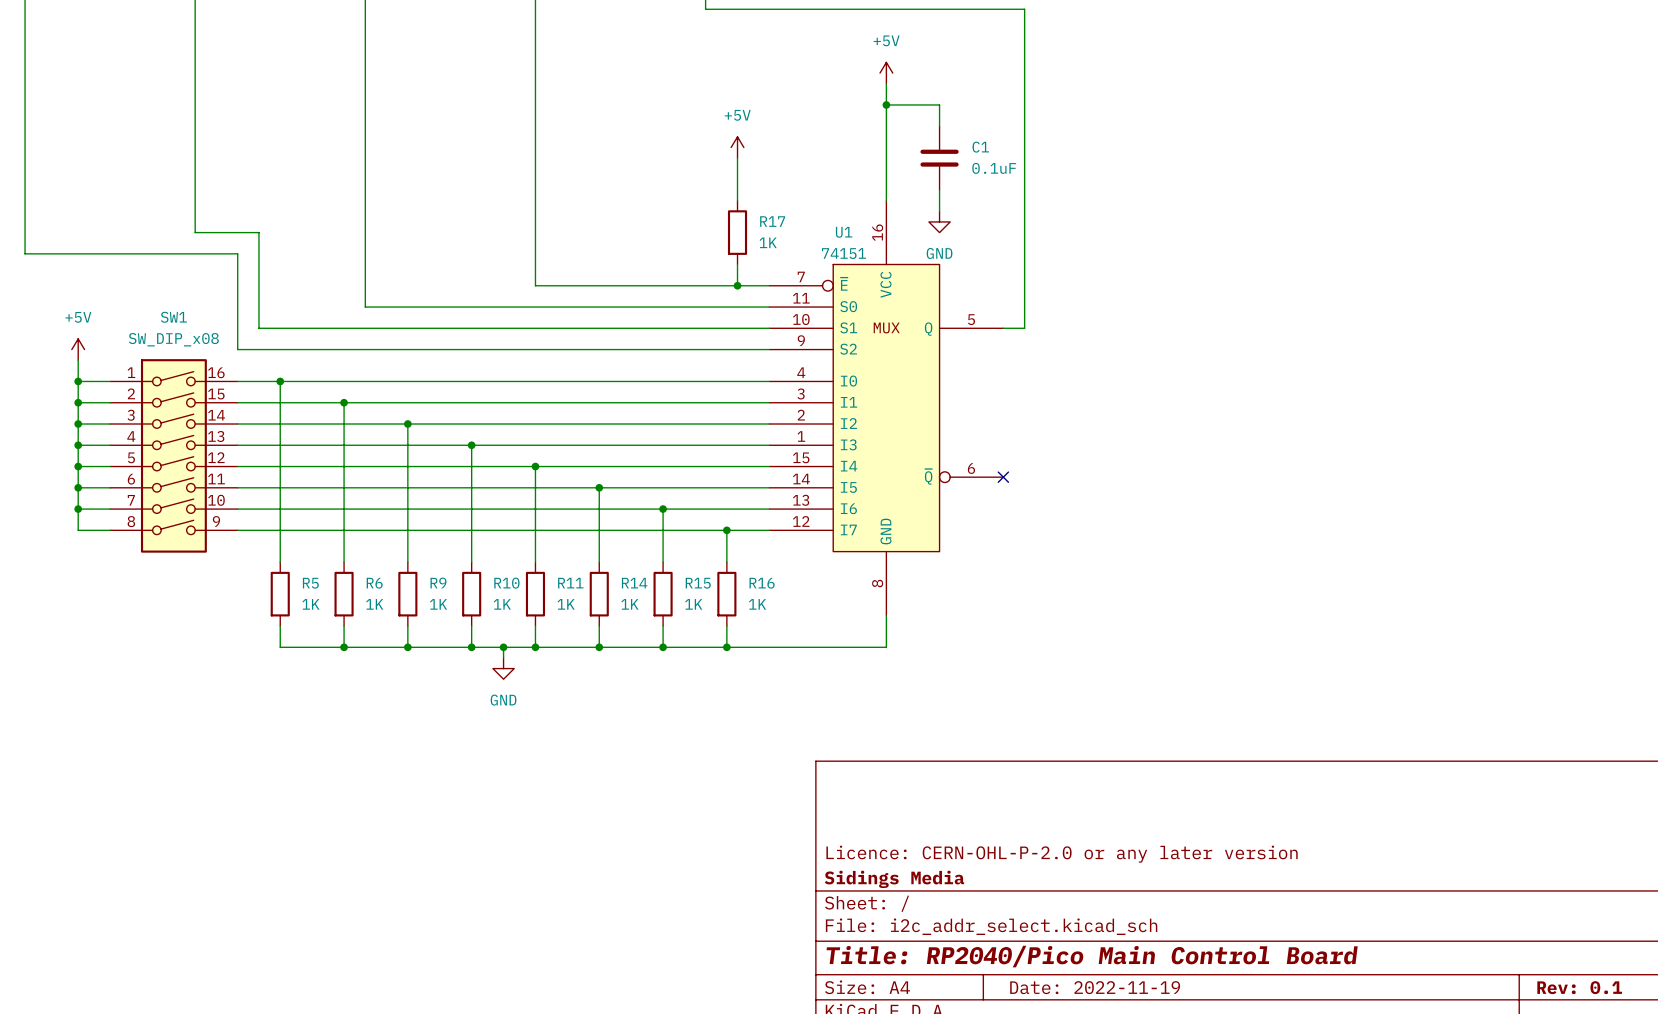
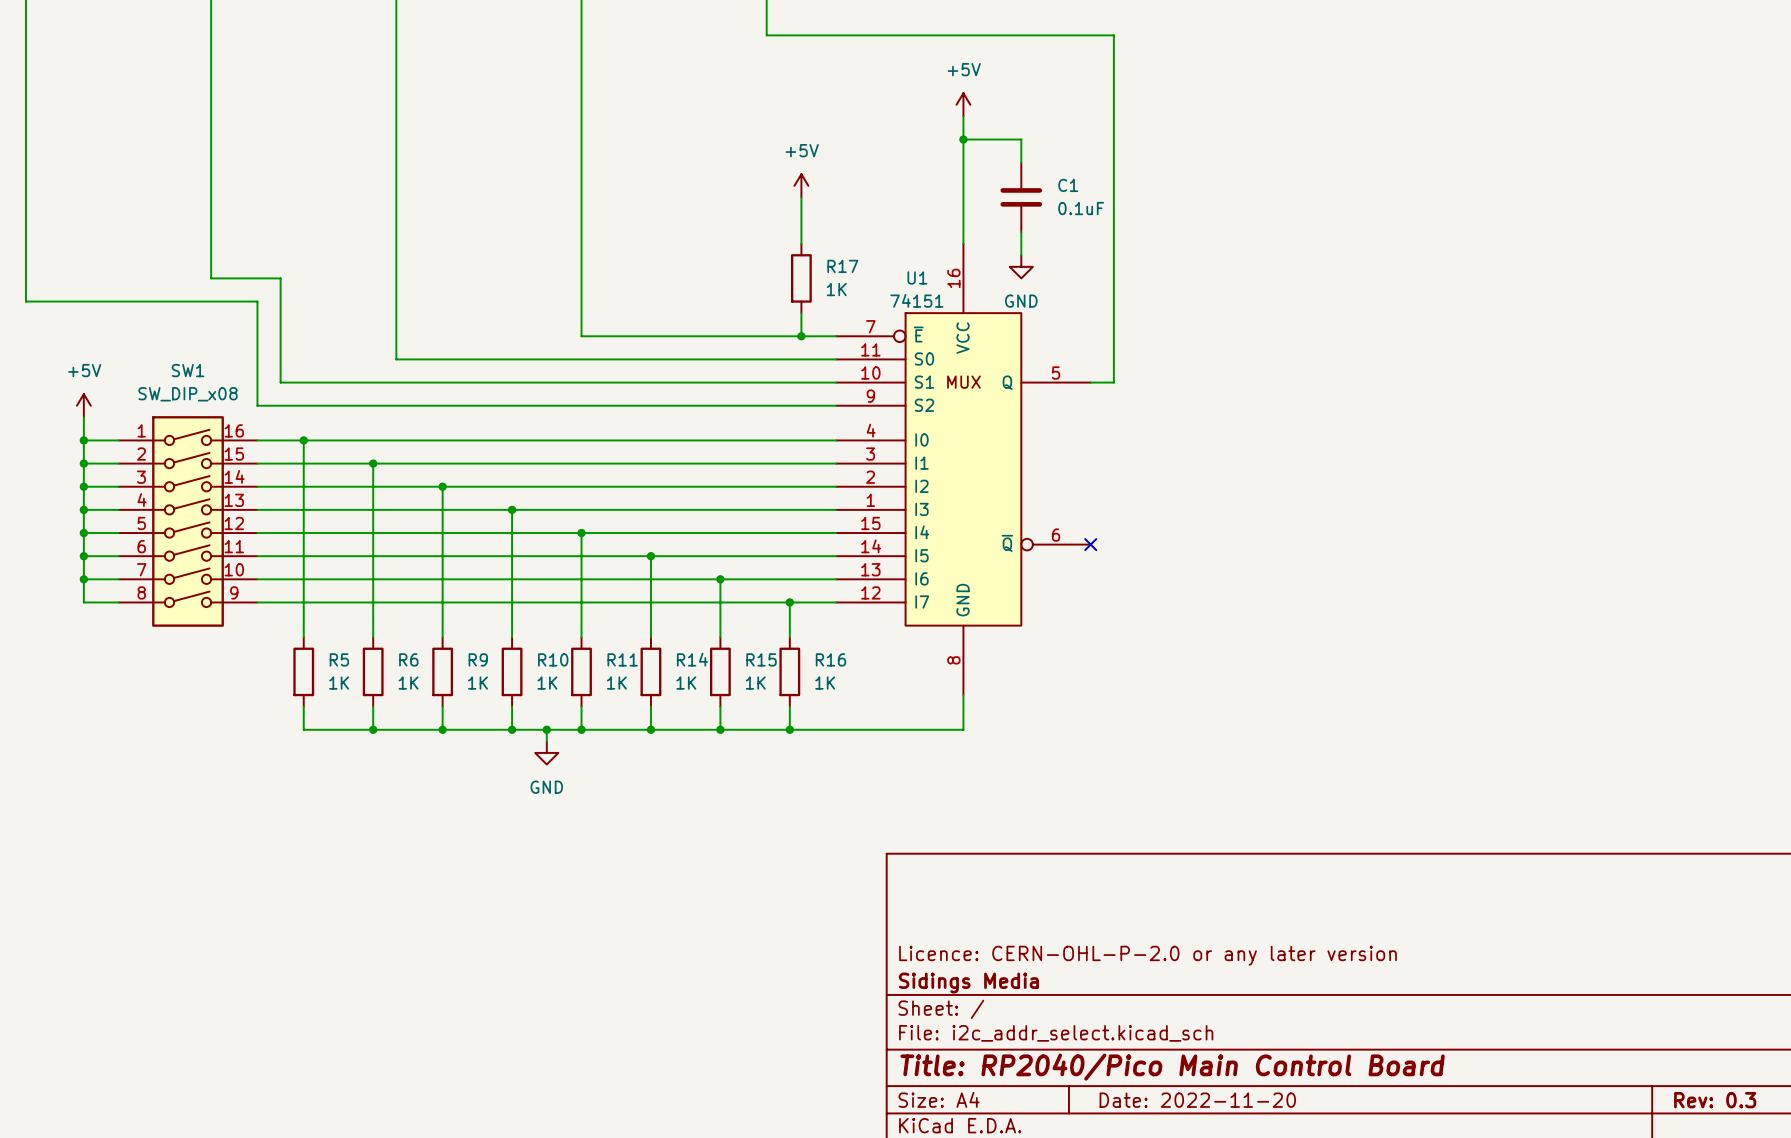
title block: Date: 2022-11-19 (1095, 987) -> Date: 2022-11-20 (1197, 1100)
title block: Rev: 0.1 (1579, 987) -> Rev: 0.3 (1715, 1100)

